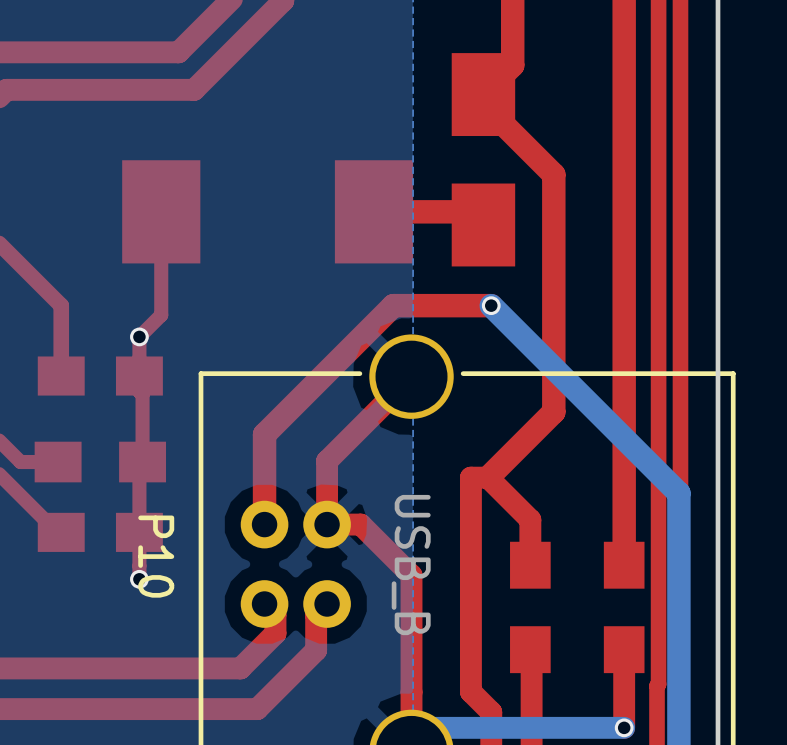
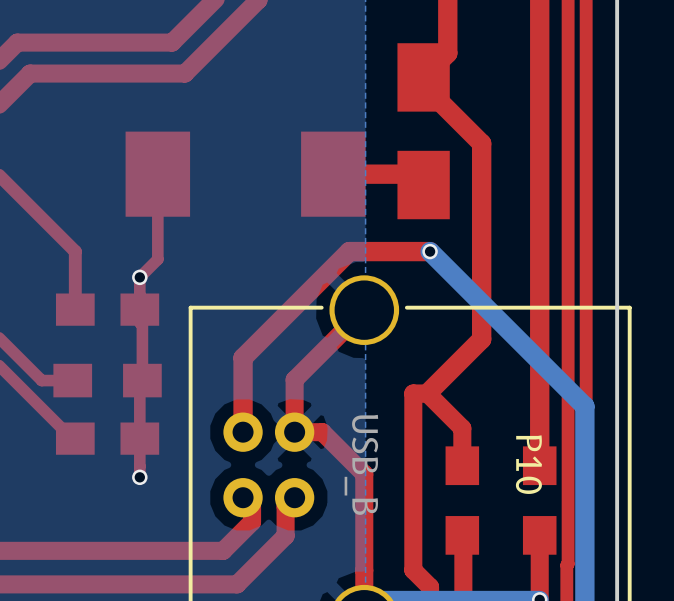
P10 name position: P10 (156, 556) -> P10 (528, 464)

